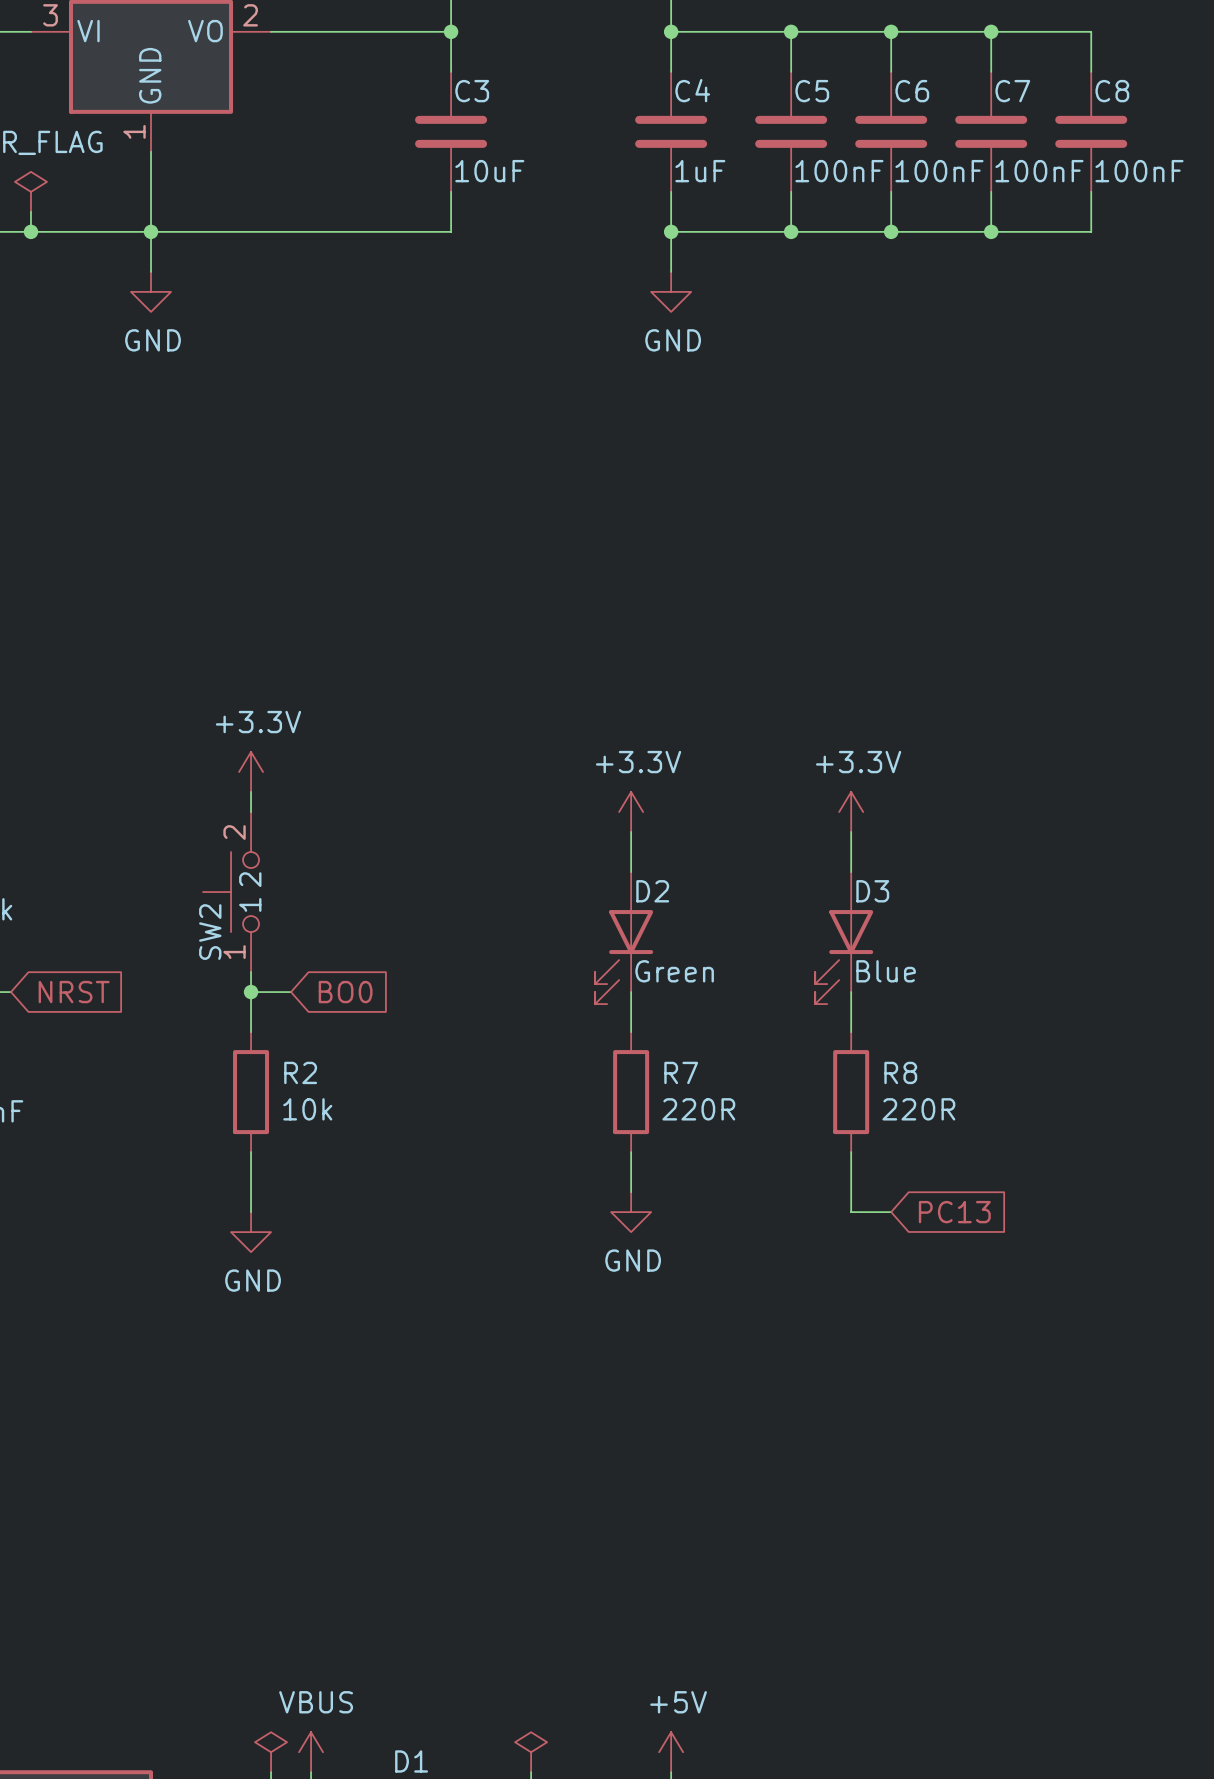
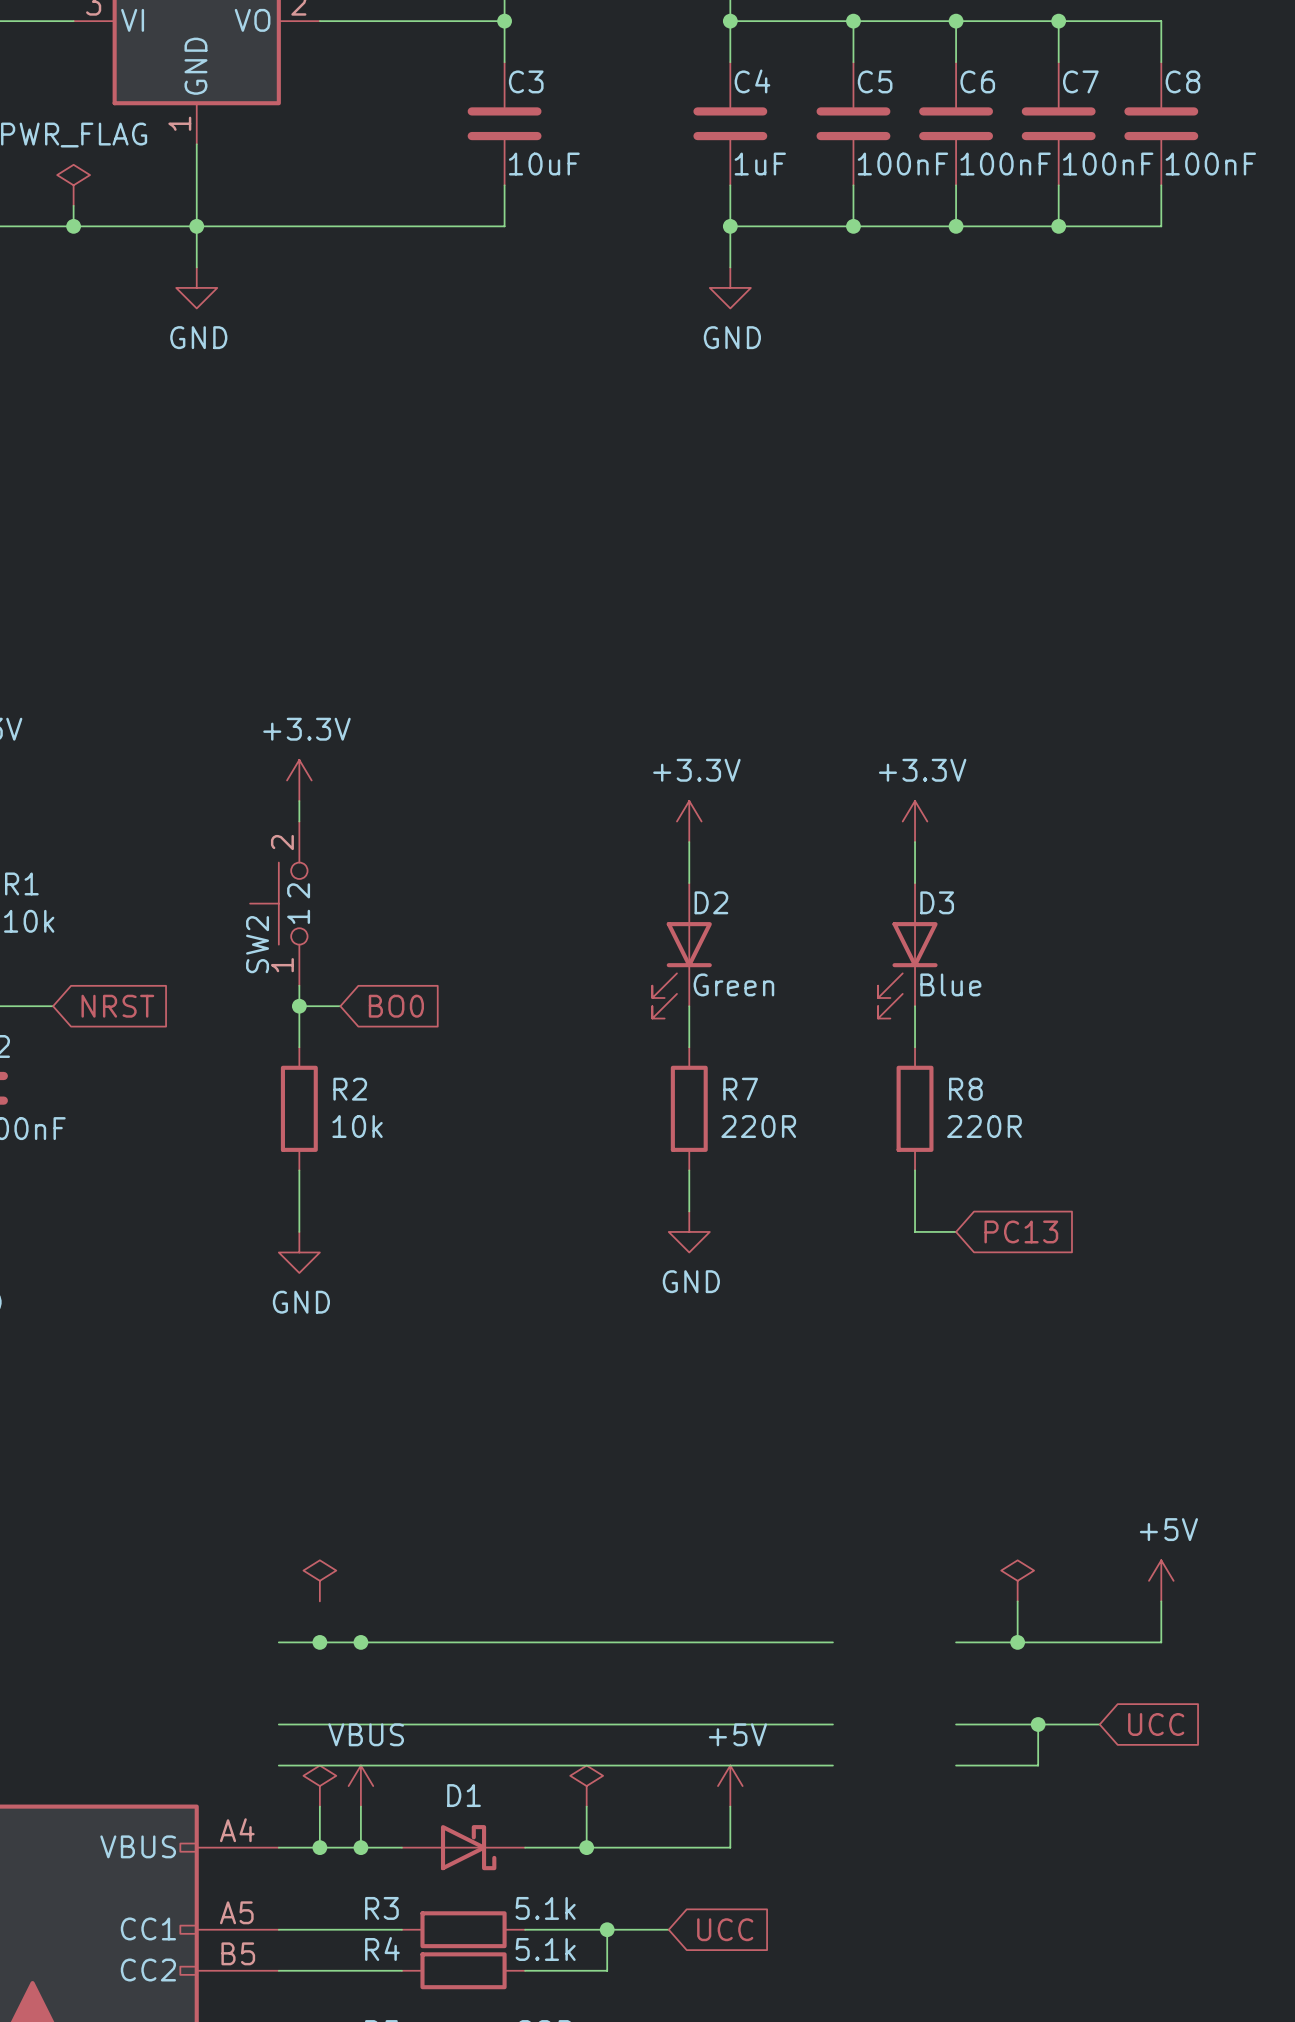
power symbol: none -> (319, 1580)
power symbol: none -> (1017, 1580)
power symbol: none -> +5V (1161, 1580)
wire: none -> (1017, 1601) (1017, 1642)
wire: none -> (1161, 1601) (1161, 1642) (956, 1642)
wire: none -> (278, 1642) (832, 1642)
junction: none -> (319, 1642)
junction: none -> (360, 1642)
junction: none -> (1017, 1642)
wire: none -> (278, 1724) (832, 1724)
wire: none -> (956, 1724) (1099, 1724)
wire: none -> (1038, 1724) (1038, 1765) (956, 1765)
junction: none -> (1038, 1724)
global label: none -> UCC (1156, 1724)
wire: none -> (278, 1765) (832, 1765)

